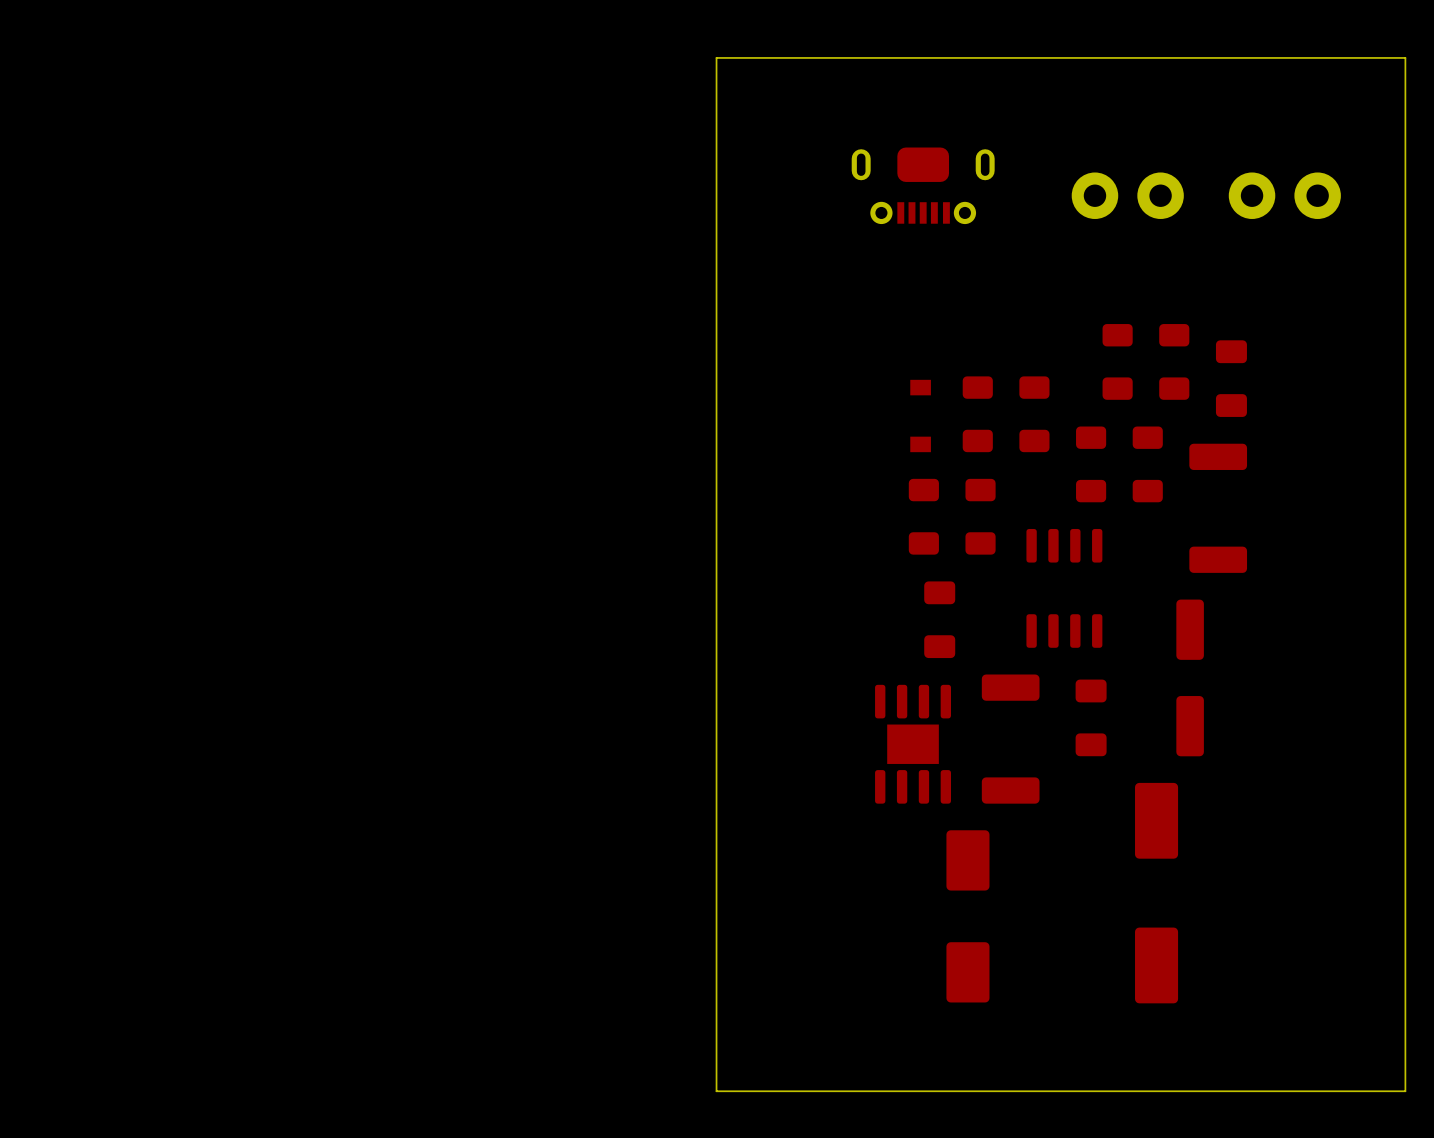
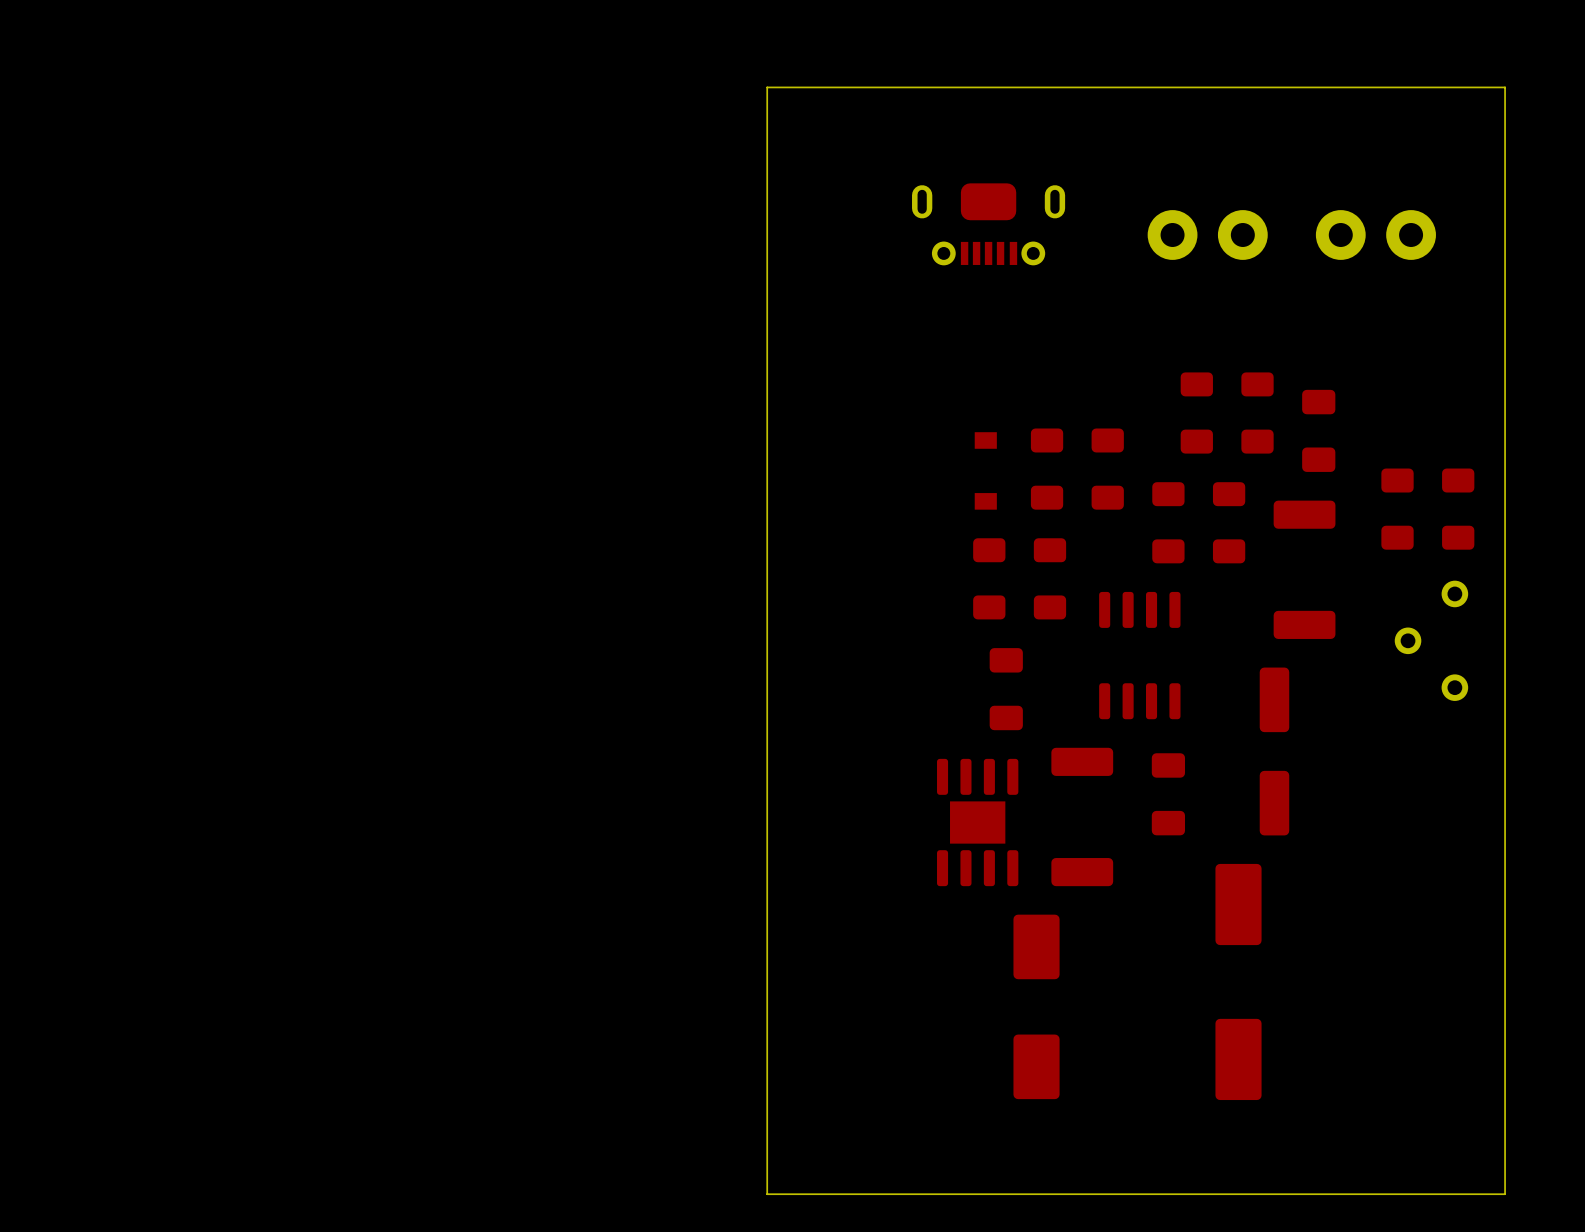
part: none -> (1397, 509)
part: none -> (1458, 509)
part: none -> (1431, 640)

